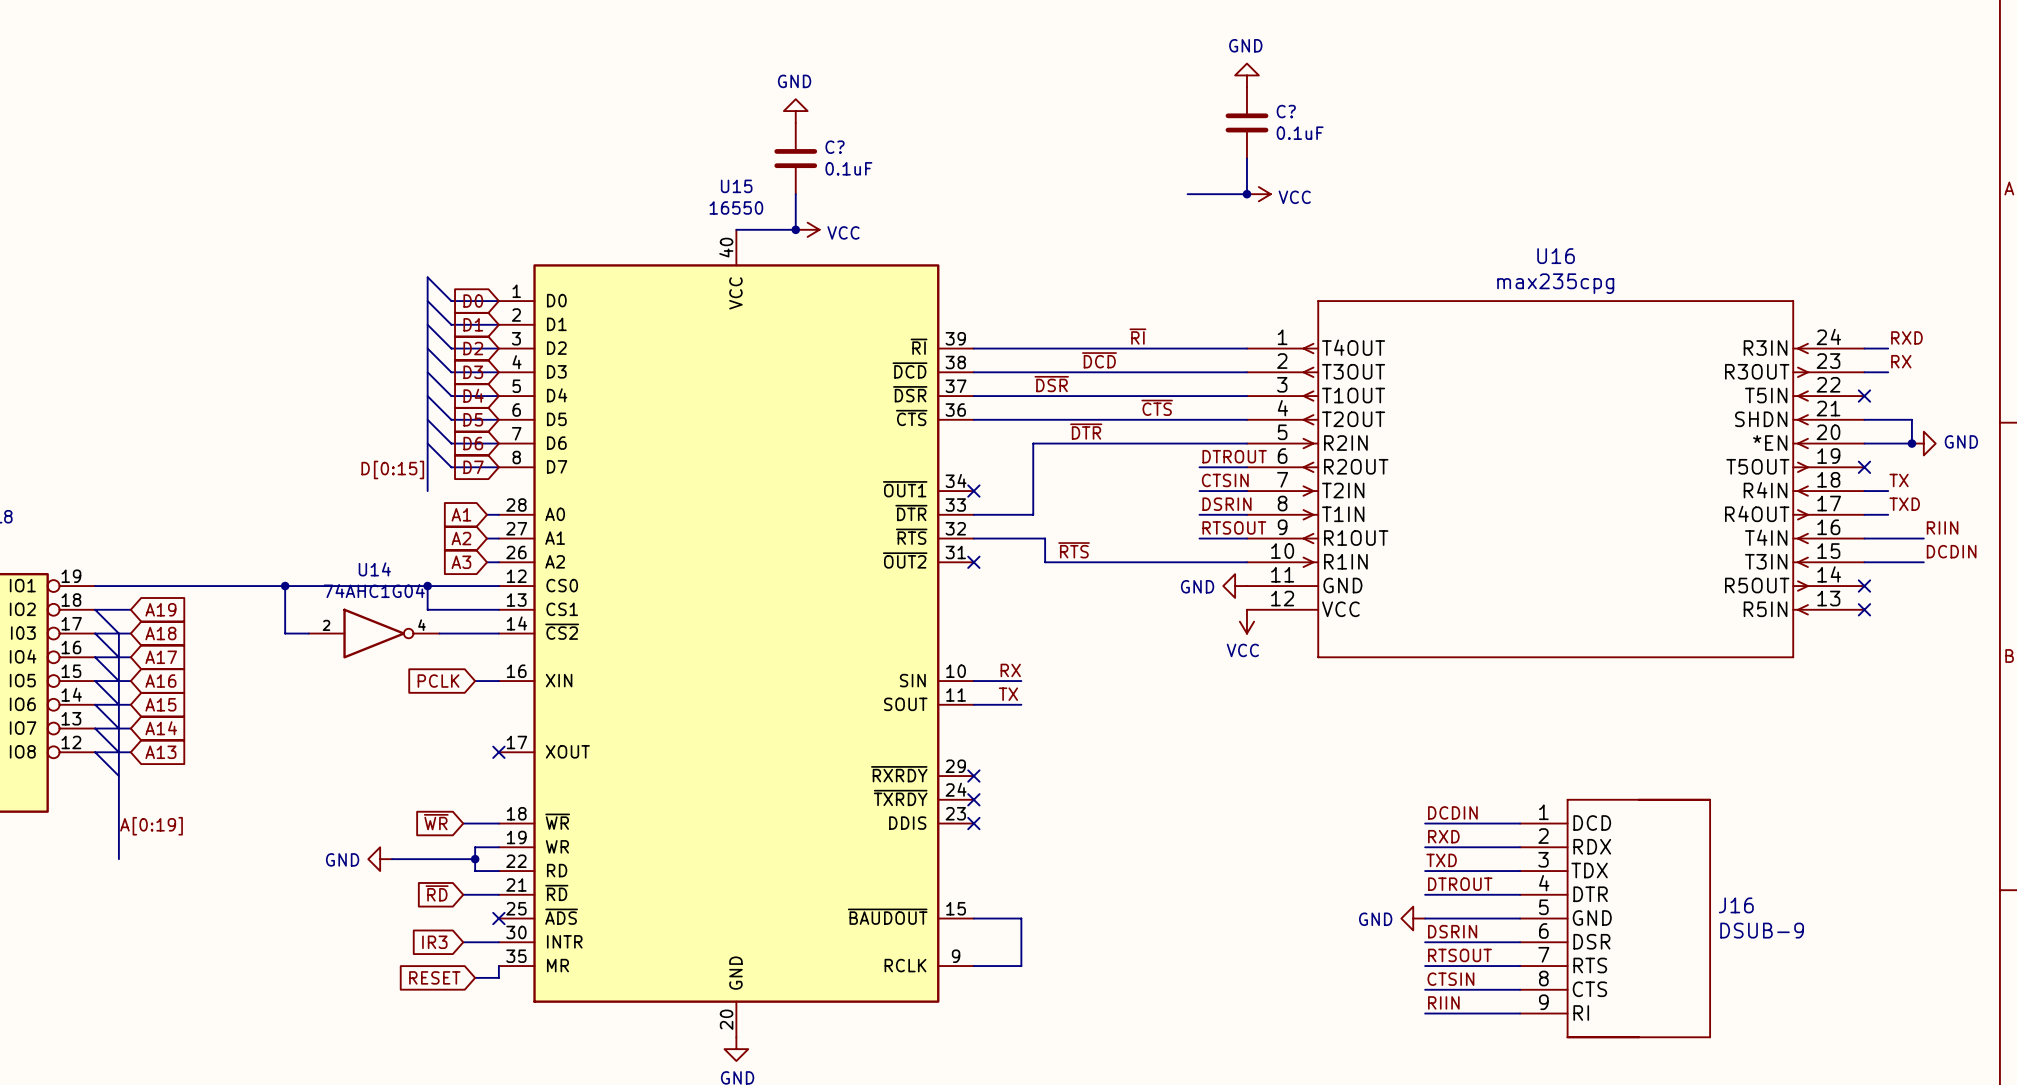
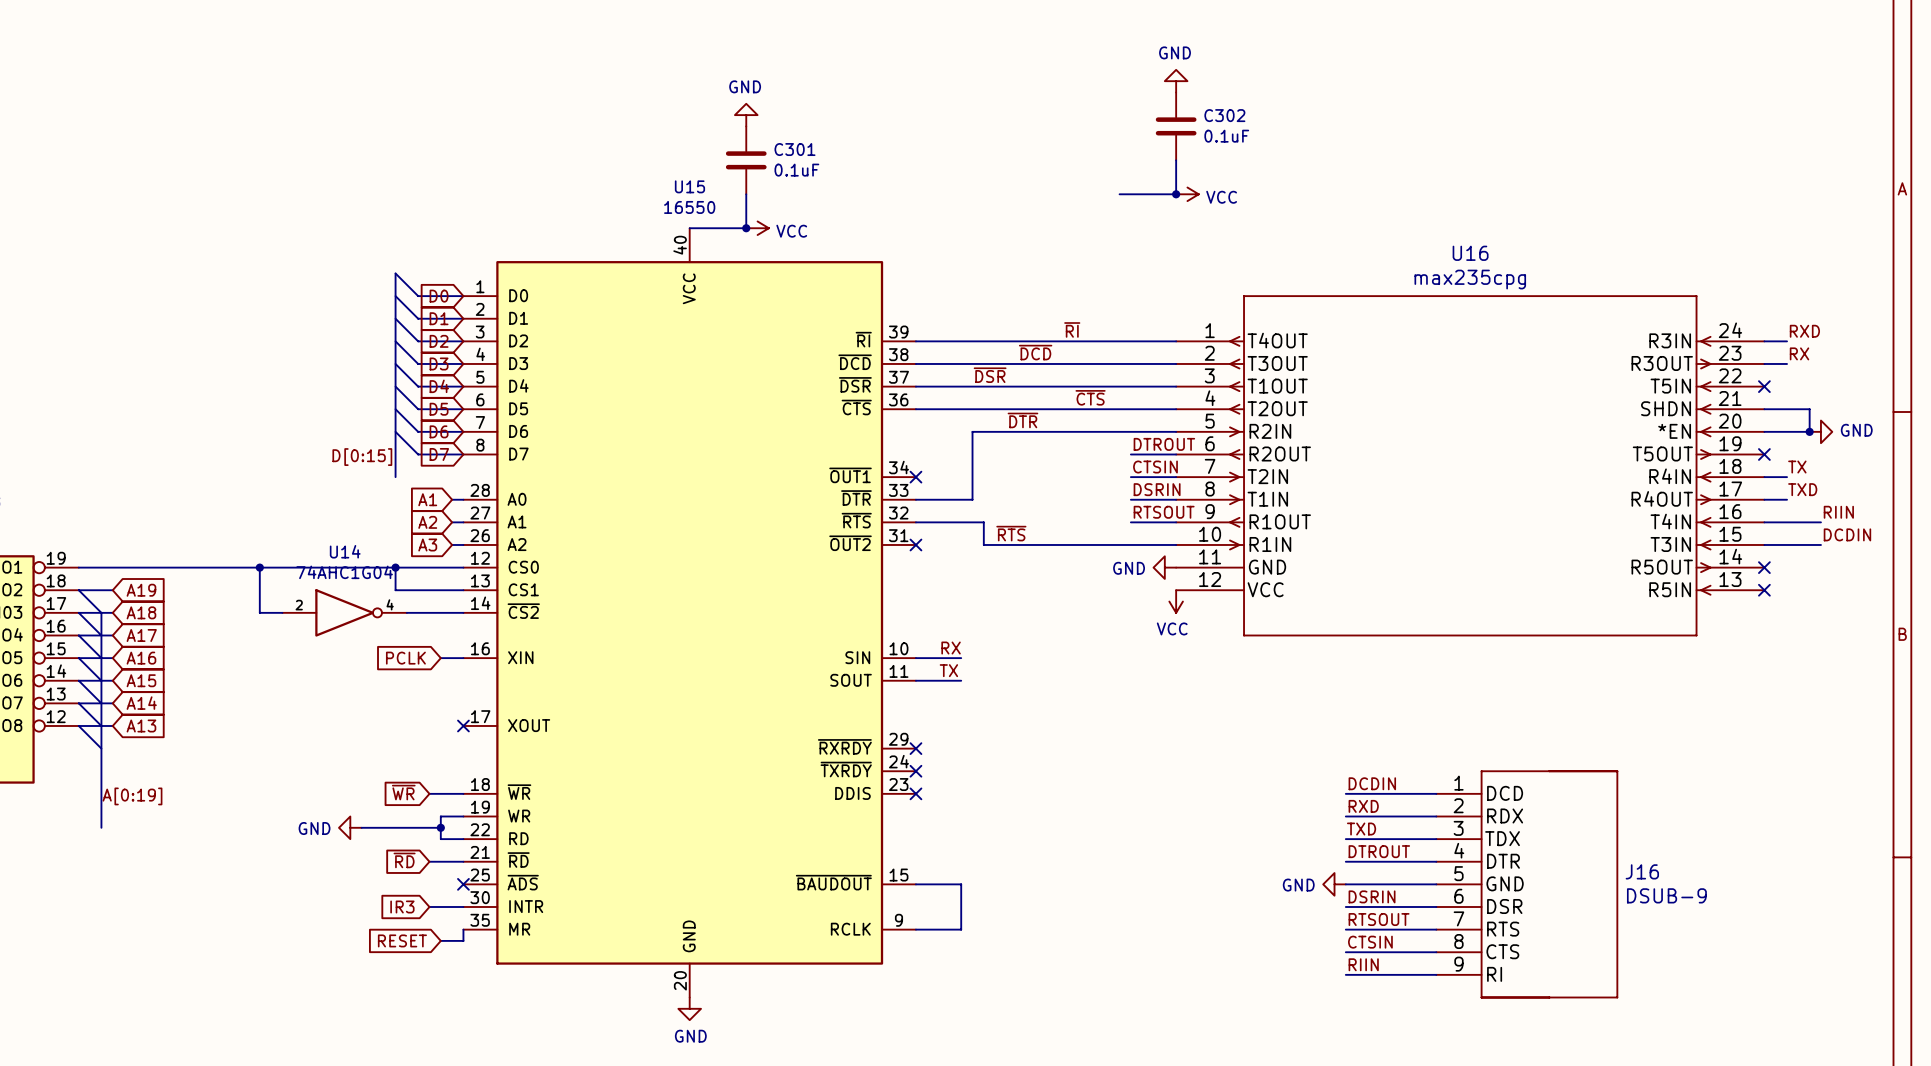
C? name: C? (1286, 111) -> C302 (1224, 115)
C? name: C? (835, 147) -> C301 (794, 149)

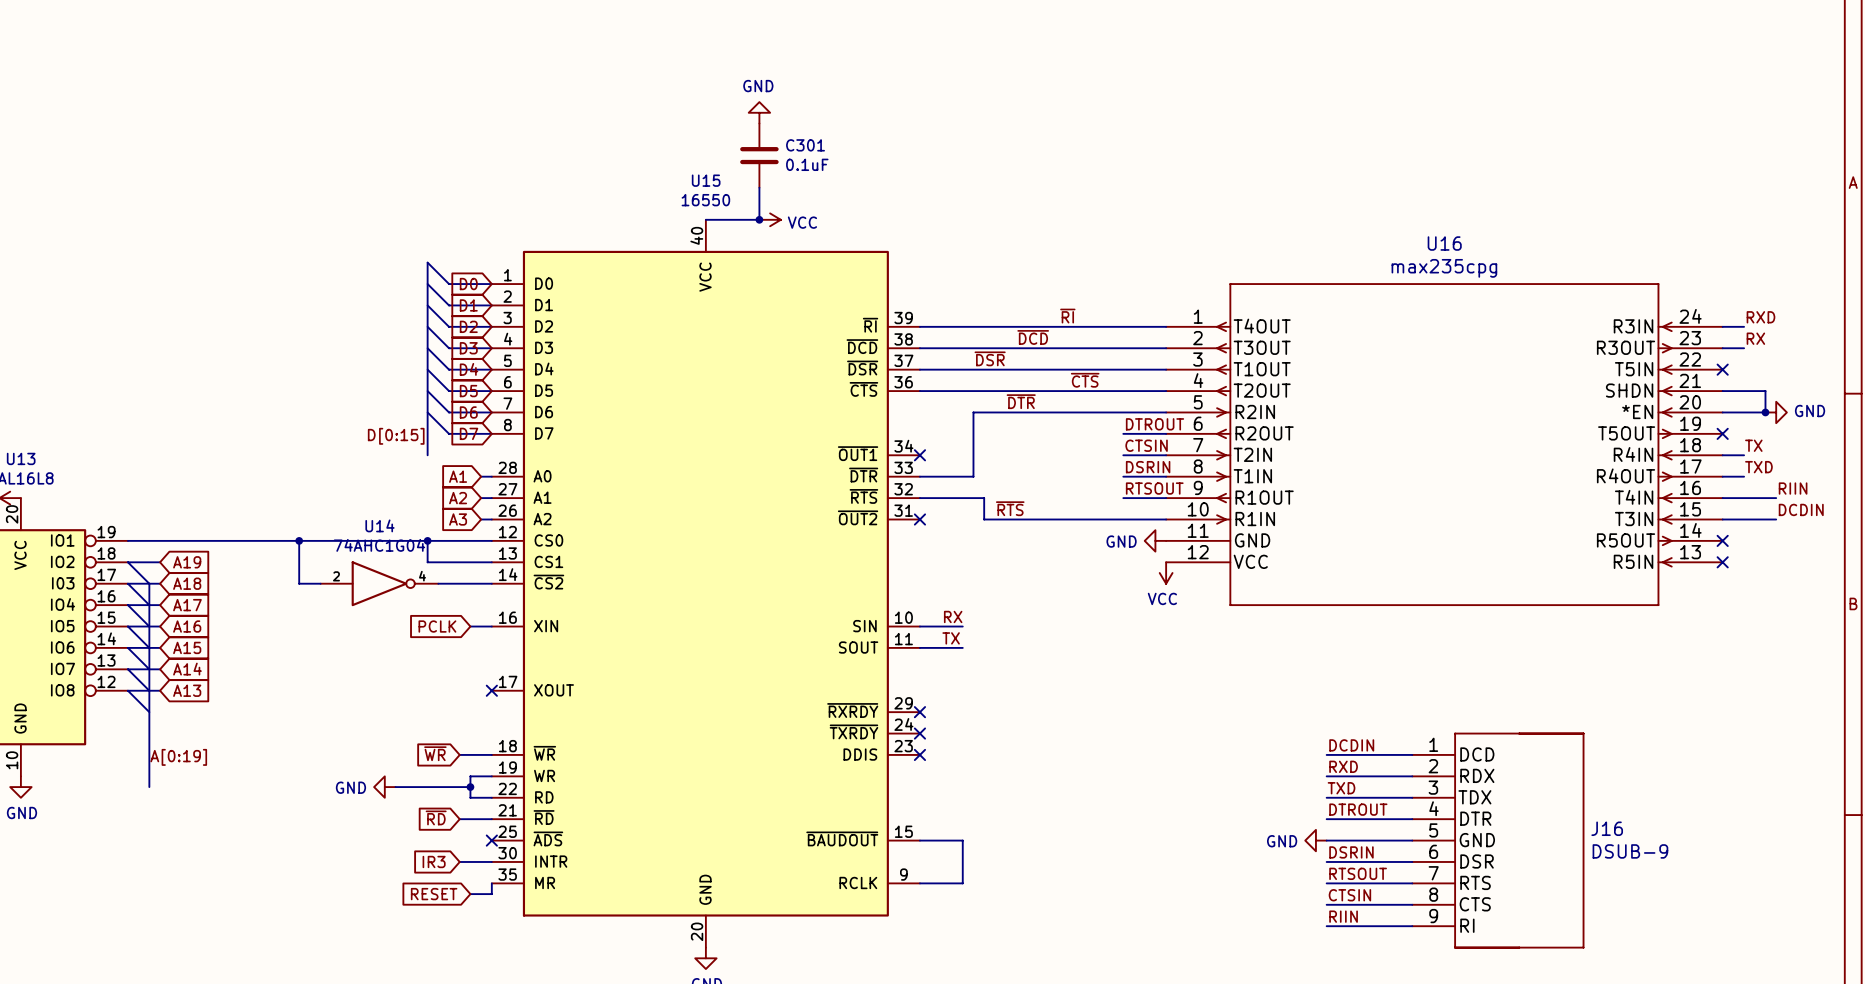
power symbol: GND (1176, 81) -> none
C302: 0.1uF (1176, 126) -> none
wire: (1176, 160) (1176, 194) (1119, 194) -> none
junction: (1176, 194) -> none
power symbol: VCC (1187, 194) -> none

